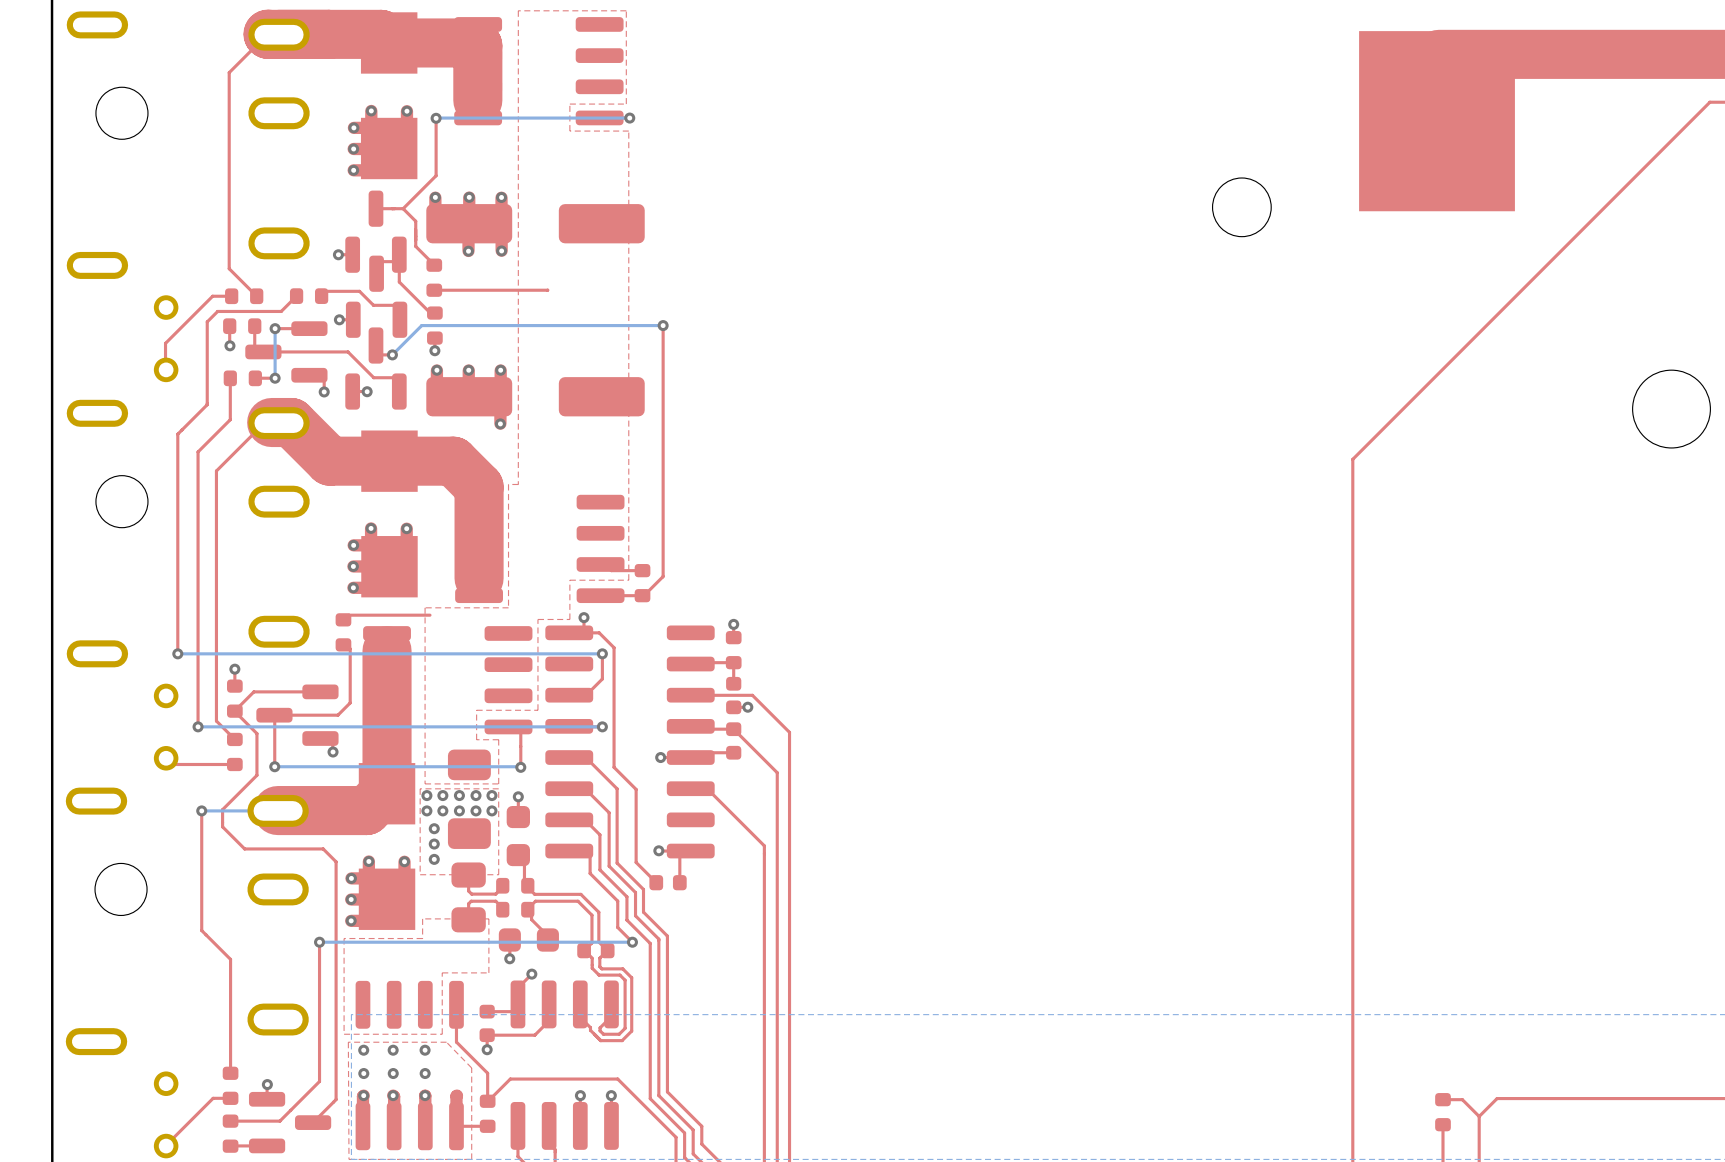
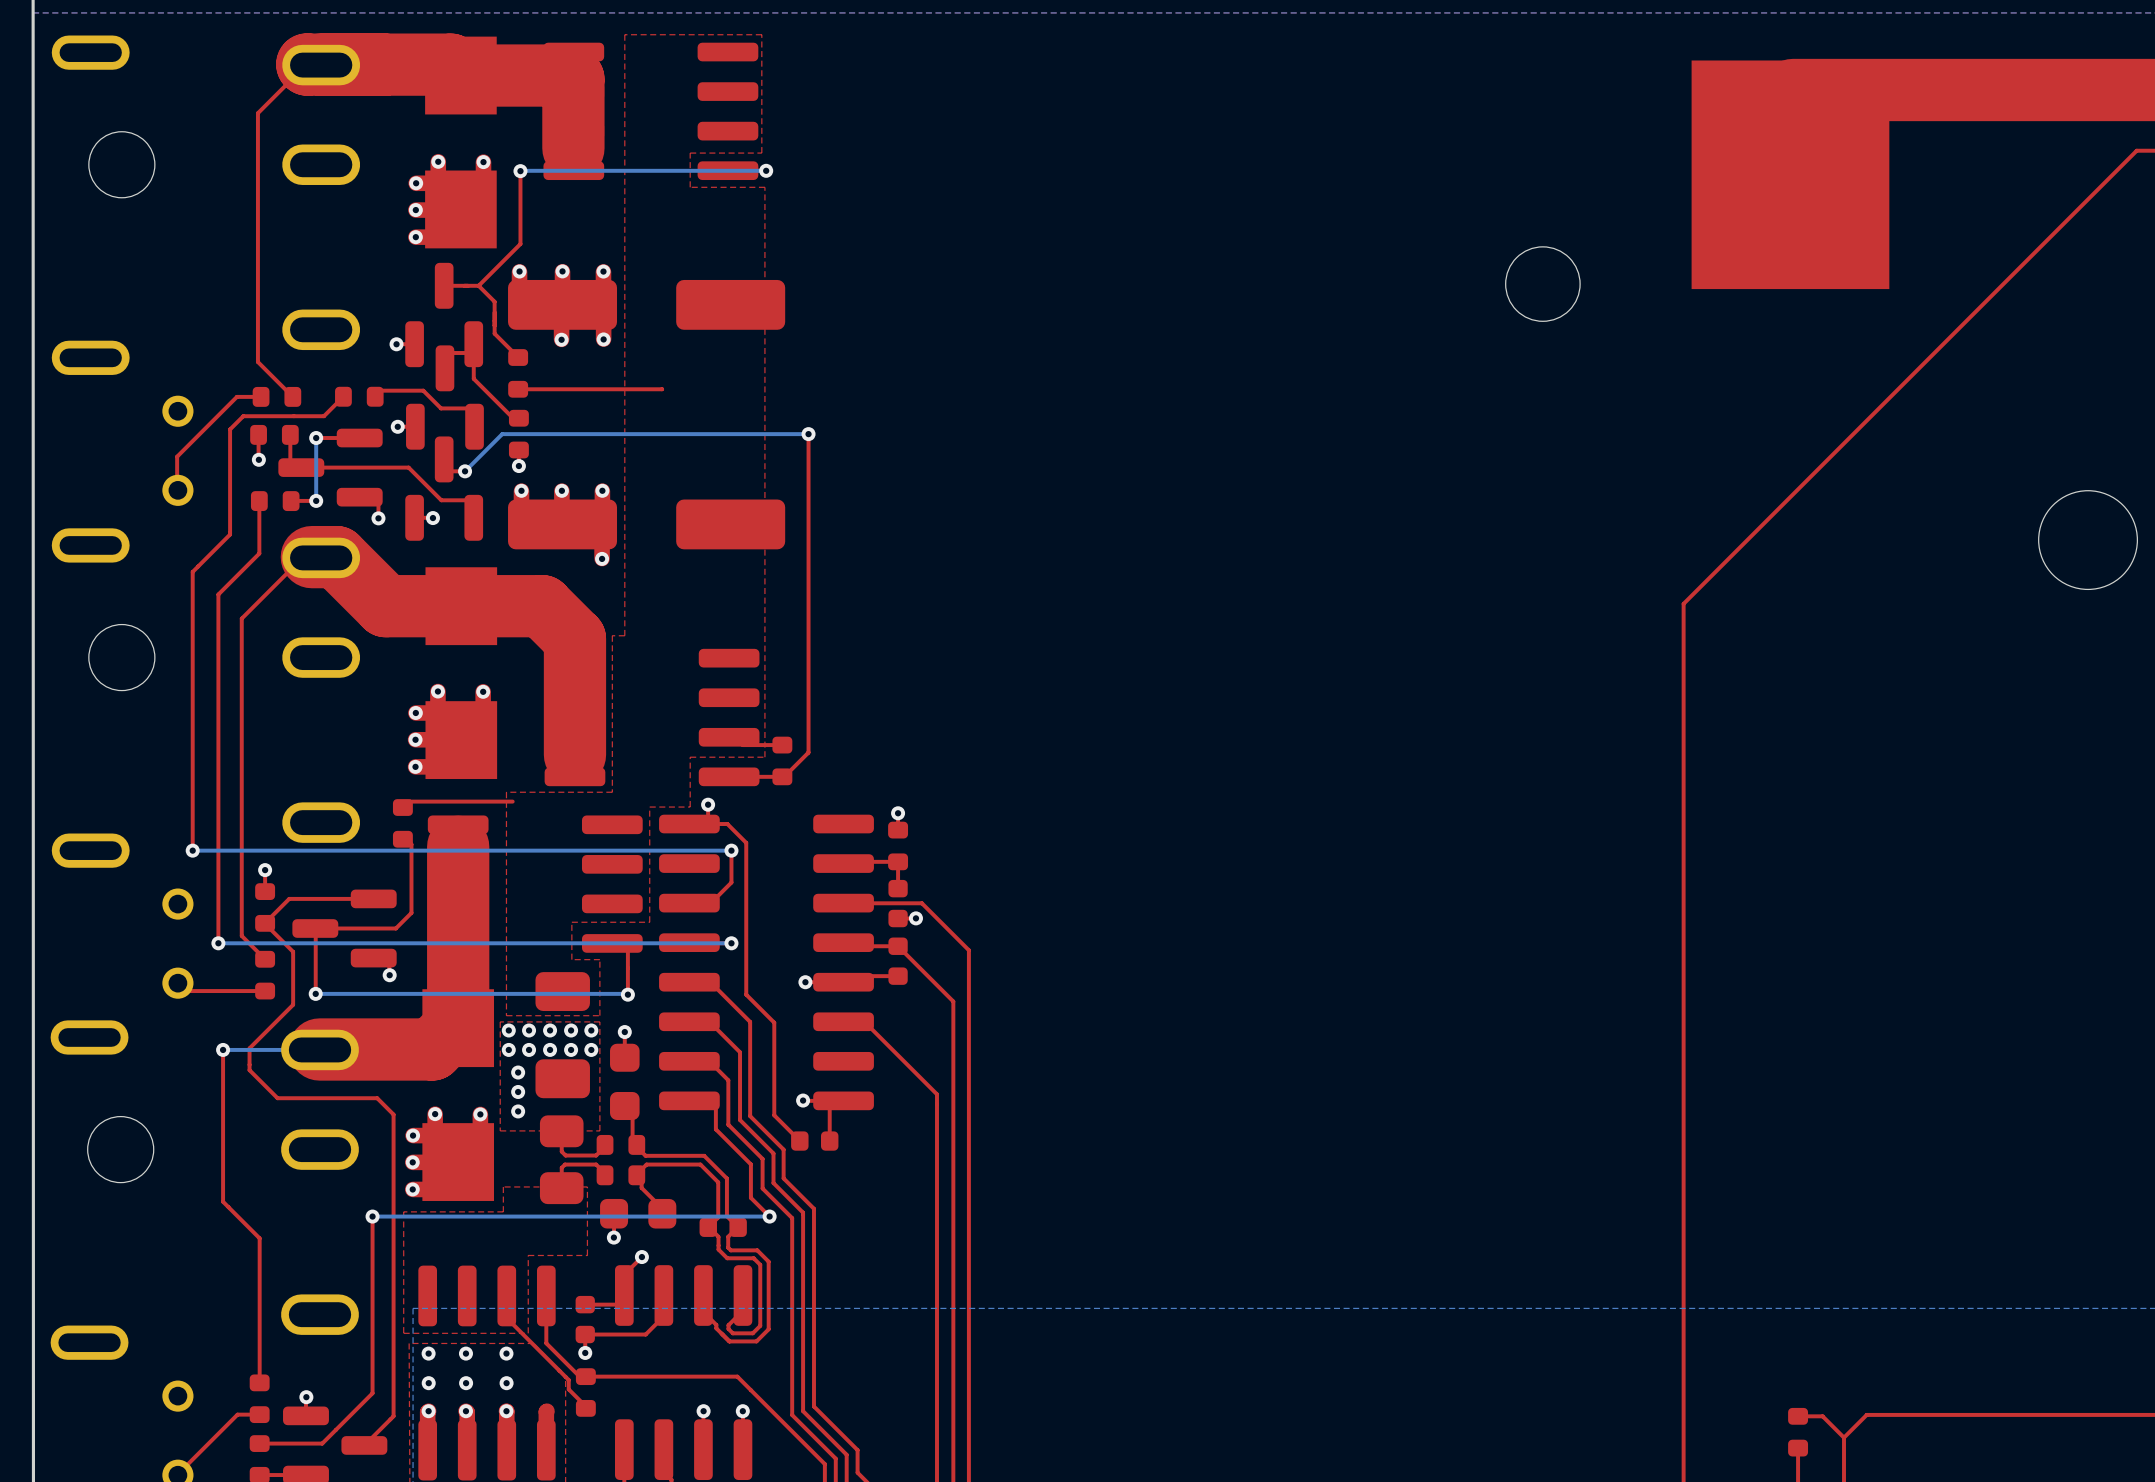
top track: none -> (506, 1295) (506, 1318) (568, 1380) (568, 1389) (587, 1408)
top track: (487, 1073) (487, 1101) -> none
top track: (617, 1079) (510, 1079) (488, 1101) -> (750, 1390) (737, 1376) (585, 1376)
part position: (487, 1113) -> (585, 1392)
top track: (487, 1126) (456, 1126) -> none

